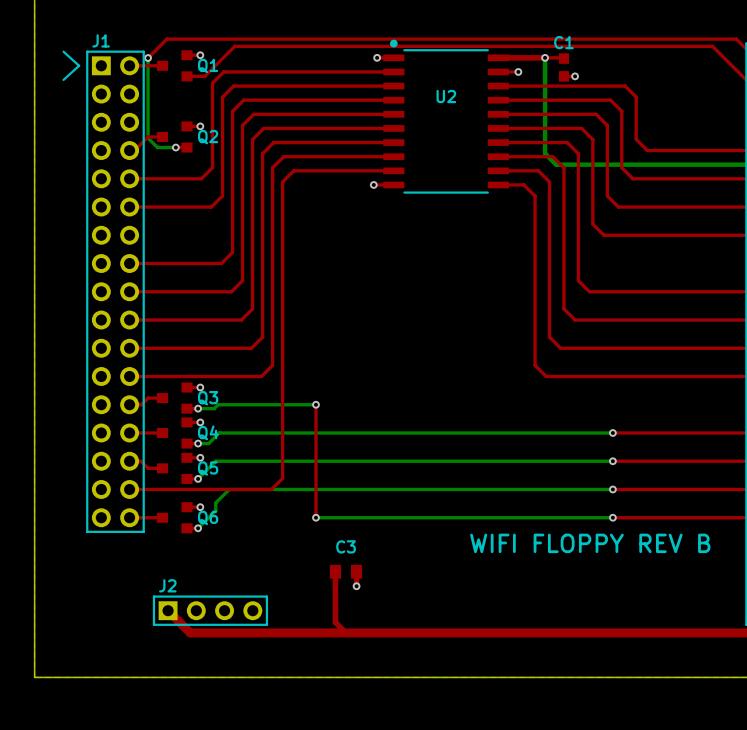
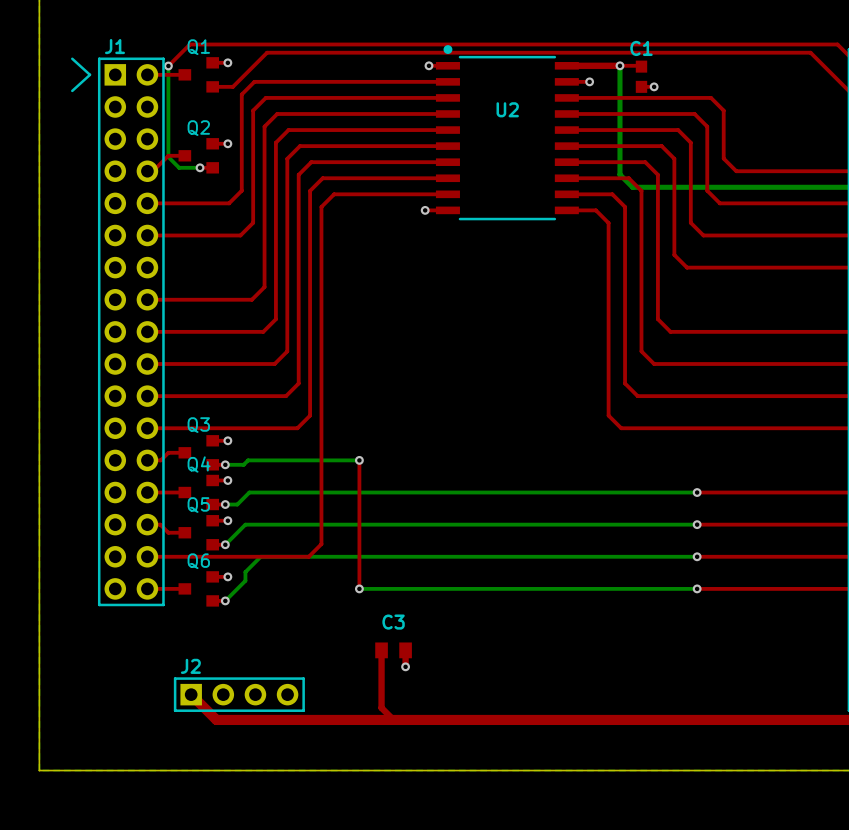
Q1 name position: Q1 (208, 65) -> Q1 (198, 47)
Q2 name position: Q2 (208, 137) -> Q2 (198, 128)
Q3 name position: Q3 (208, 398) -> Q3 (198, 425)
Q4 name position: Q4 (208, 432) -> Q4 (199, 464)
Q5 name position: Q5 (208, 468) -> Q5 (198, 505)
Q6 name position: Q6 (208, 517) -> Q6 (198, 561)
text: WIFI FLOPPY REV B (590, 543) -> none

